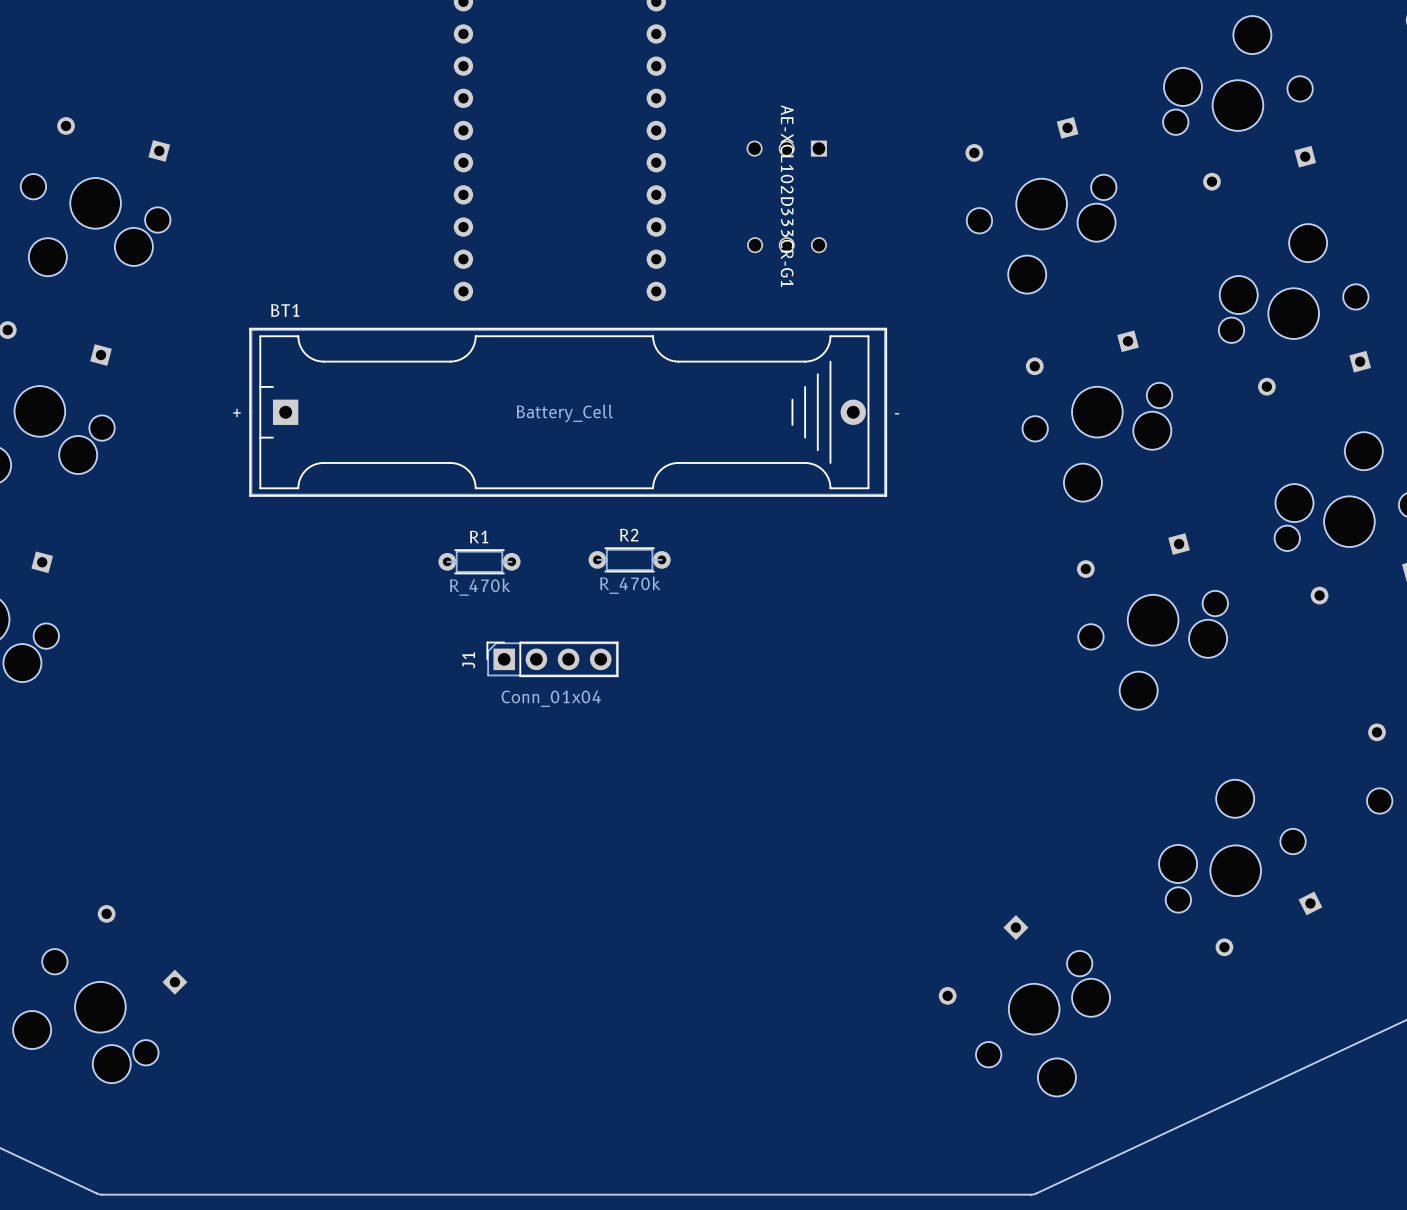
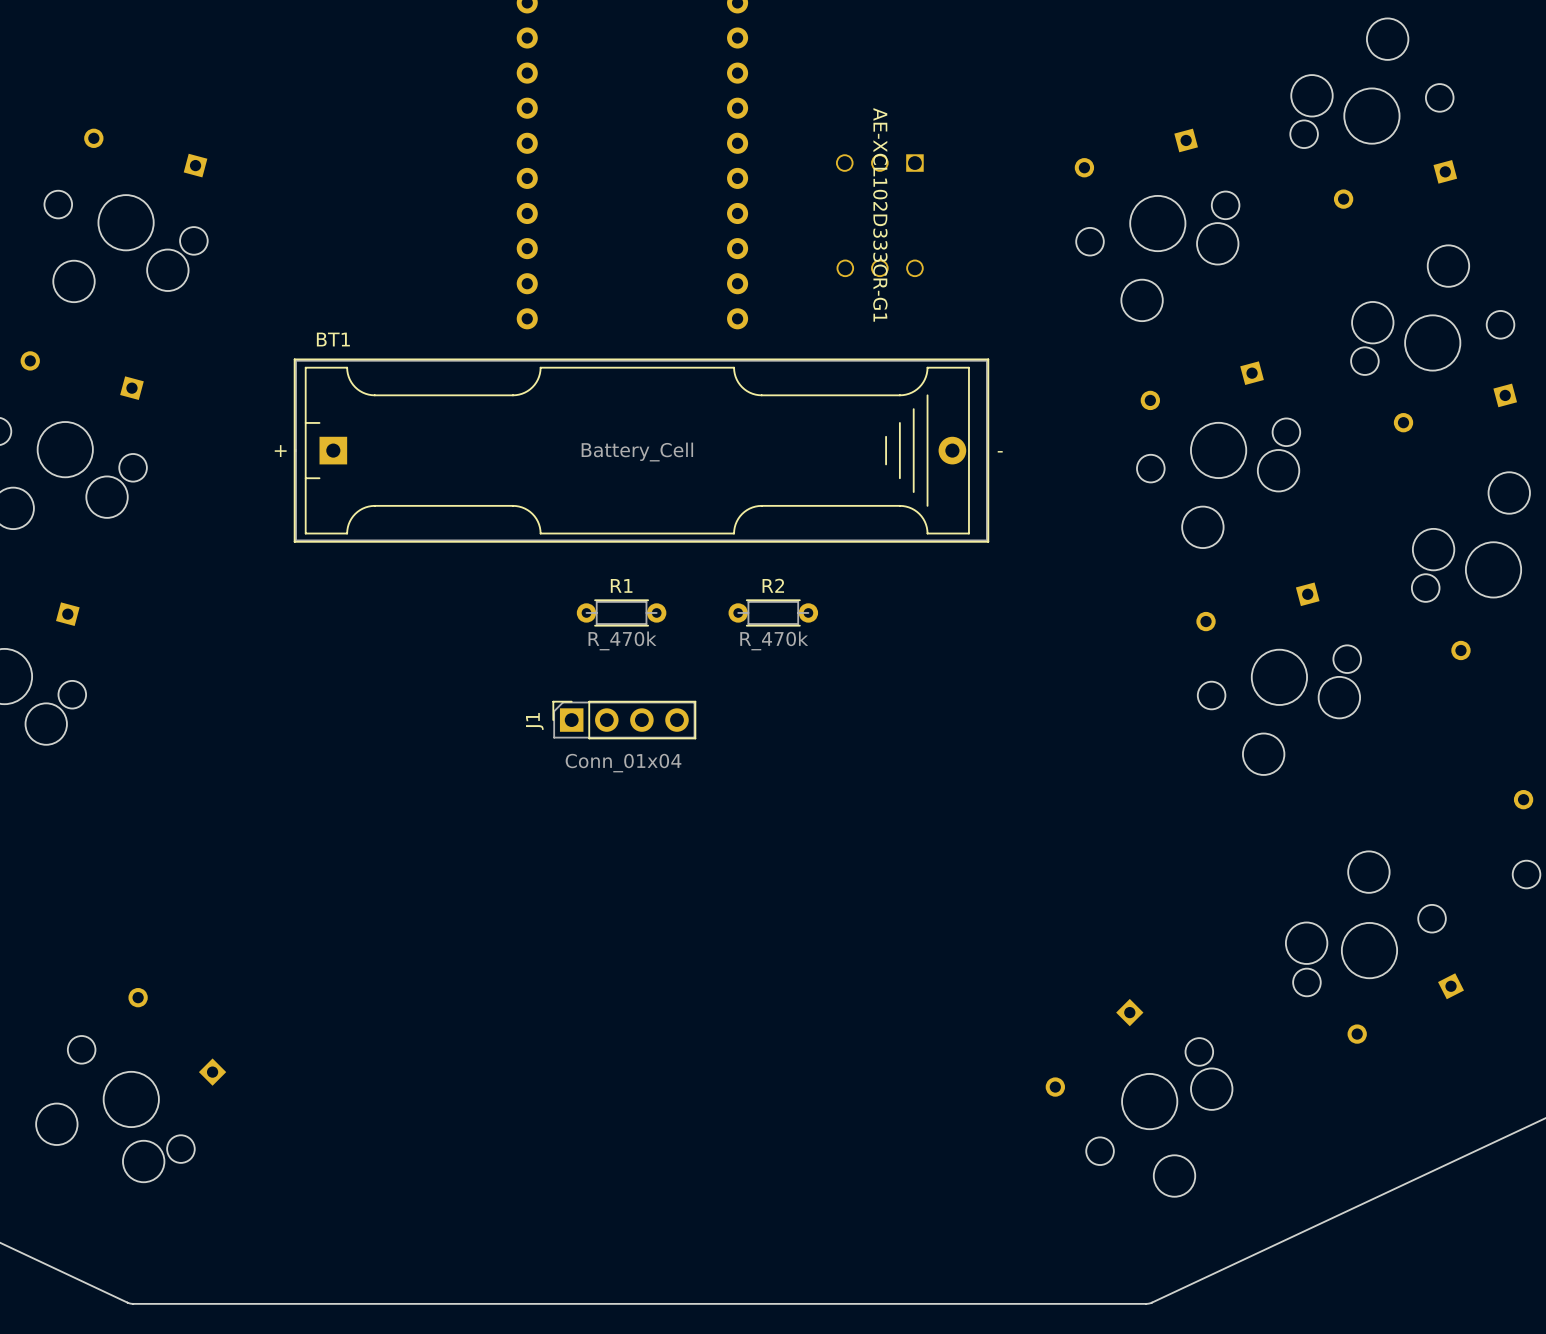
R2 position: (629, 559) -> (773, 612)
R1 position: (479, 561) -> (621, 612)

